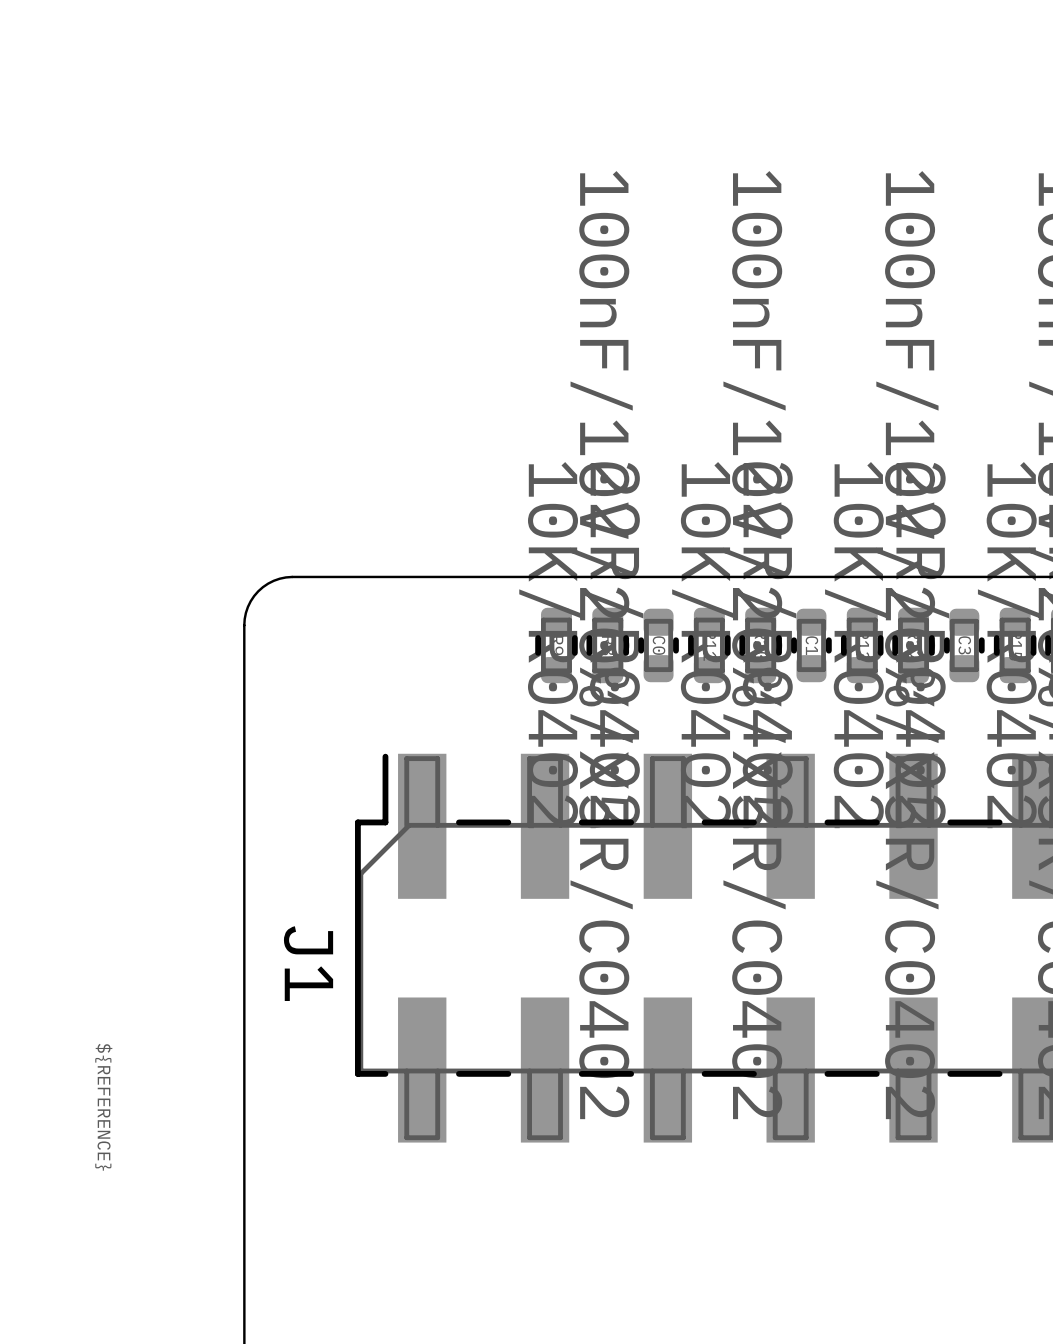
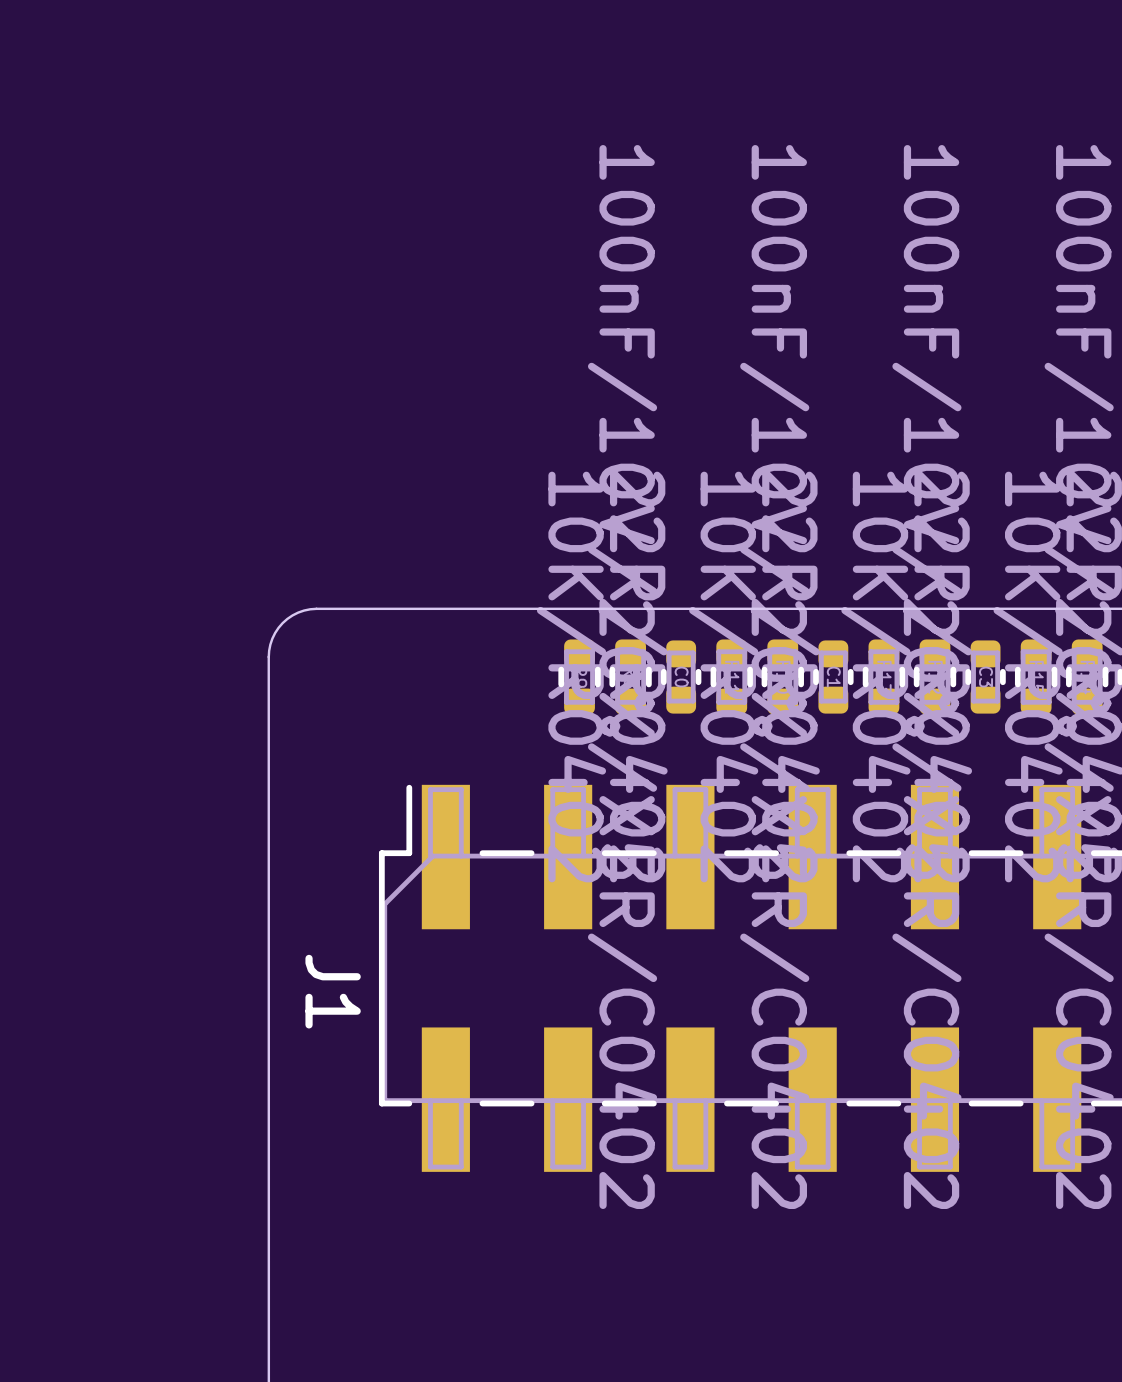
text: ${REFERENCE} (103, 1107) -> none

